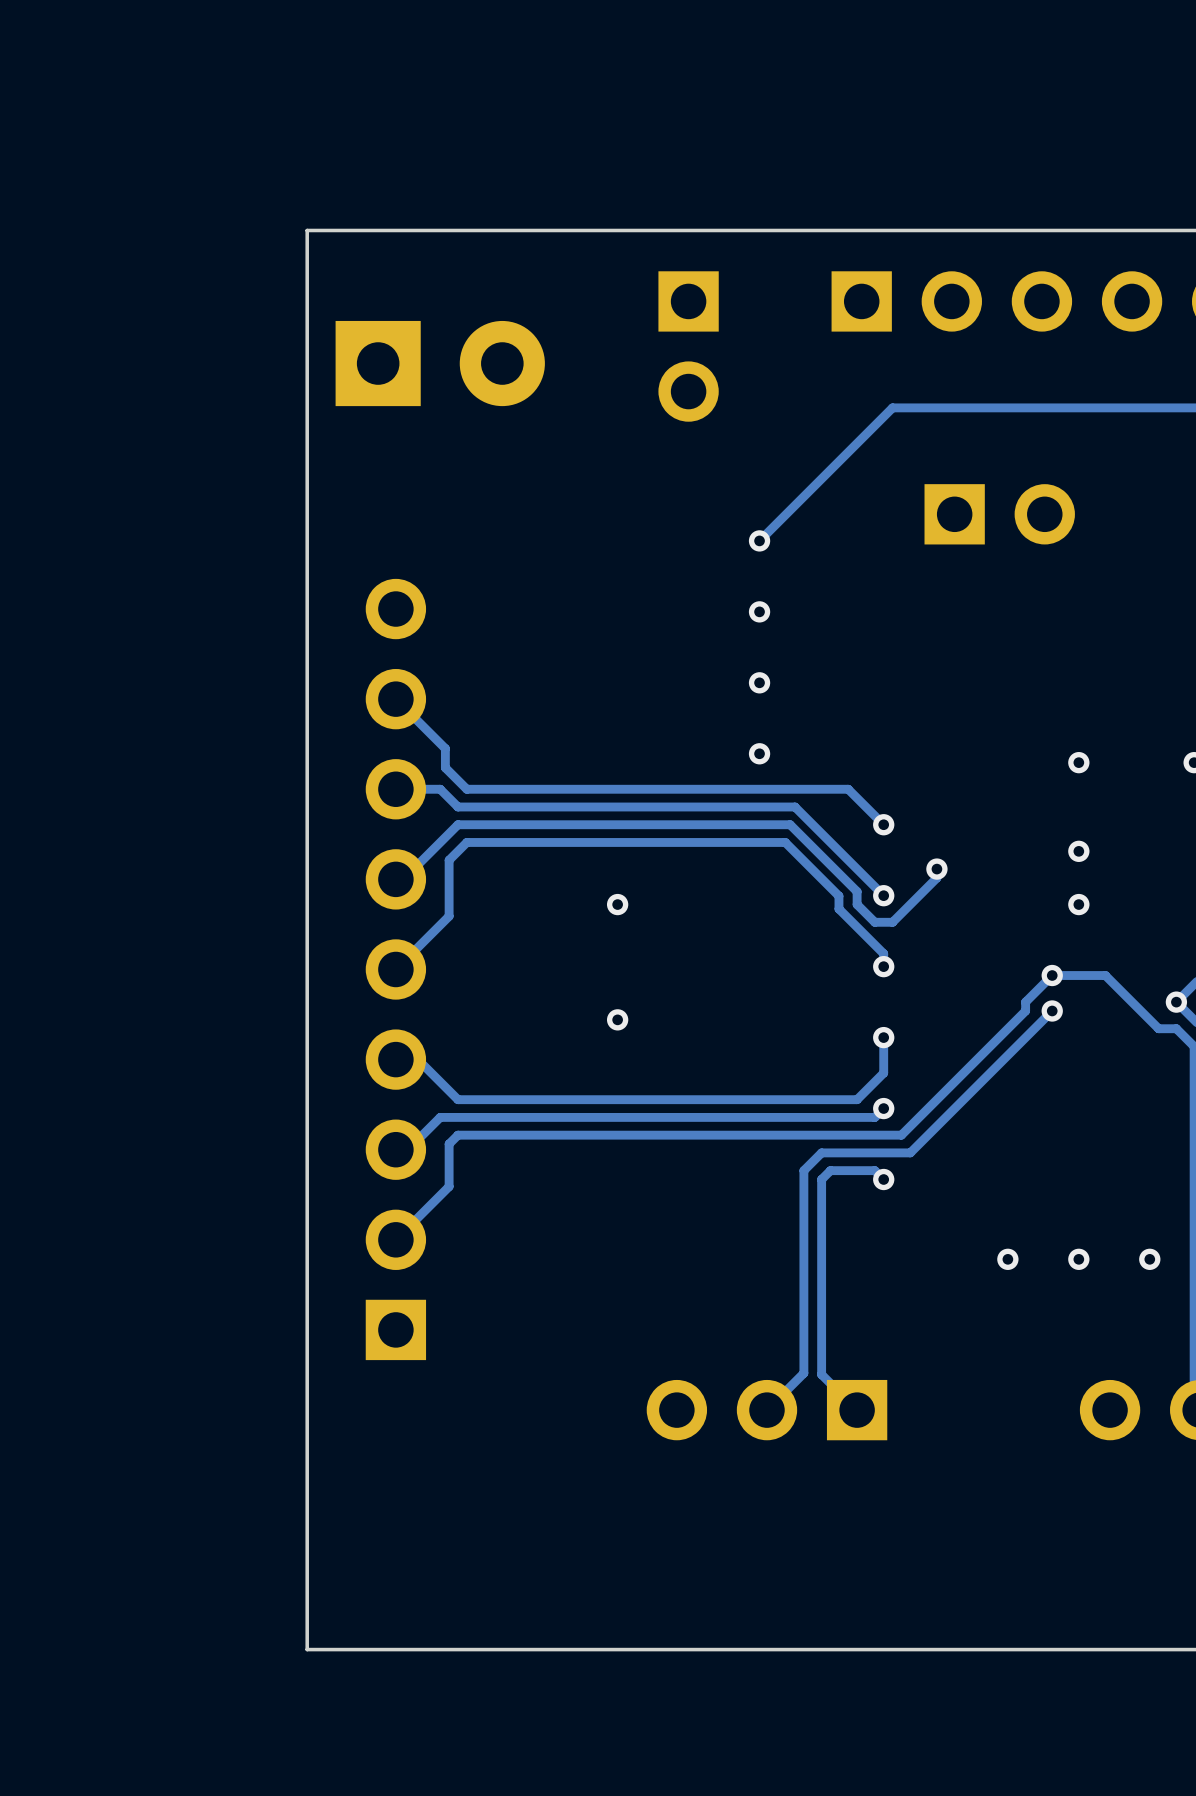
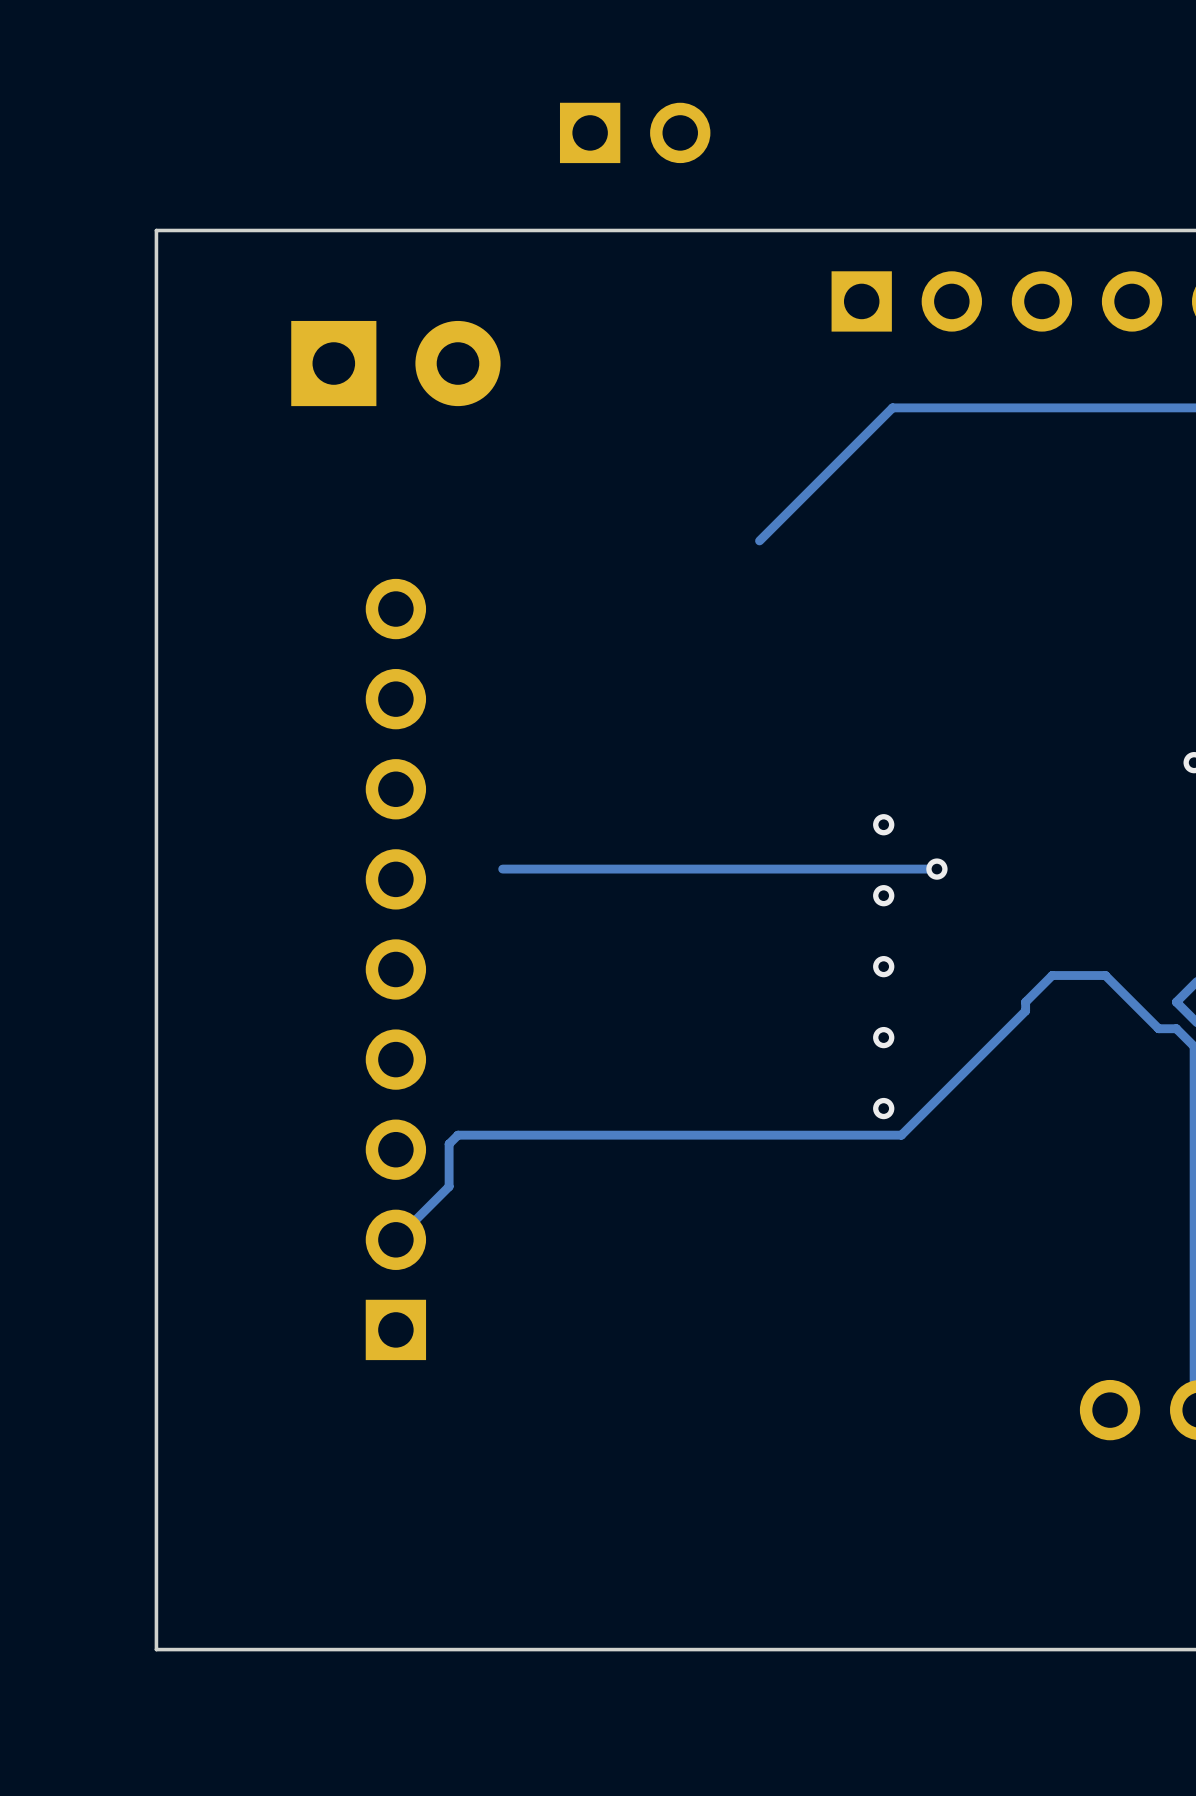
board edge: (307, 230) (307, 1649) -> (307, 230) (156, 230) (156, 1649) (307, 1649)
part rotation: 0° (688, 346) -> 90° counterclockwise (635, 132)
part position: (688, 346) -> (635, 132)
part position: (440, 363) -> (395, 363)
part: (999, 514) -> none
via: (759, 540) -> none
via: (759, 611) -> none
via: (759, 682) -> none
track: (395, 699) (445, 748) (445, 767) (466, 789) (848, 789) (883, 824) -> none
via: (759, 753) -> none
via: (1078, 762) -> none
track: (395, 798) (395, 789) (440, 789) (457, 806) (795, 806) (883, 895) -> none
via: (1078, 851) -> none
track: (936, 869) (936, 877) (892, 922) (874, 922) (857, 904) (857, 891) (790, 824) (457, 824) (403, 879) (395, 879) -> (936, 869) (502, 869)
via: (617, 904) -> none
via: (1078, 904) -> none
track: (883, 966) (883, 953) (838, 908) (838, 896) (785, 842) (466, 842) (449, 860) (449, 916) (395, 969) -> none
via: (1052, 975) -> none
via: (1176, 1002) -> none
track: (1052, 1010) (910, 1152) (821, 1152) (803, 1170) (803, 1373) (766, 1410) -> none
via: (1052, 1010) -> none
via: (617, 1019) -> none
track: (883, 1037) (883, 1073) (857, 1099) (457, 1099) (417, 1059) (395, 1059) -> none
track: (883, 1108) (874, 1117) (440, 1117) (407, 1149) (395, 1149) -> none
track: (883, 1179) (874, 1170) (830, 1170) (821, 1179) (821, 1374) (857, 1410) -> none
via: (883, 1179) -> none
via: (1007, 1259) -> none
via: (1078, 1259) -> none
via: (1149, 1259) -> none
part: (766, 1410) -> none

